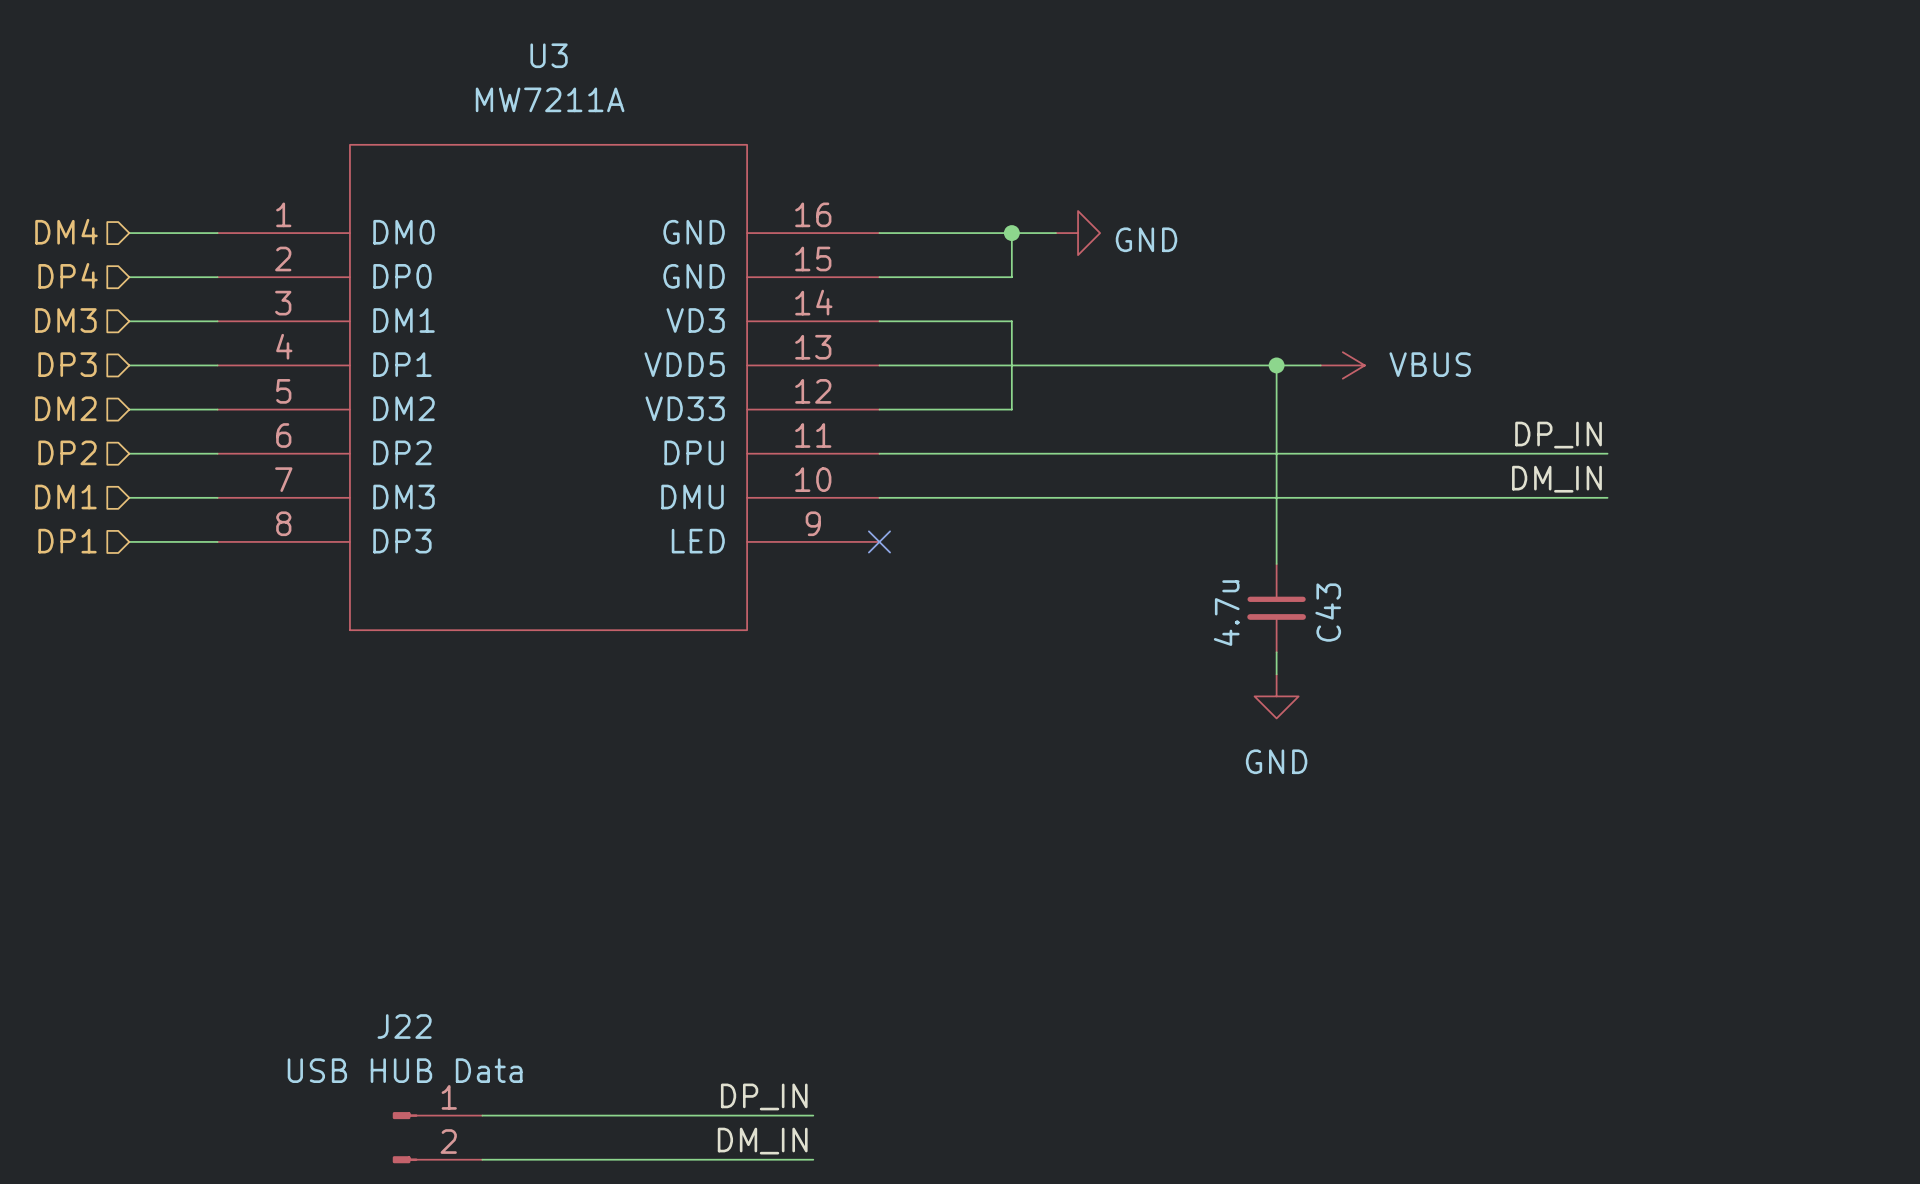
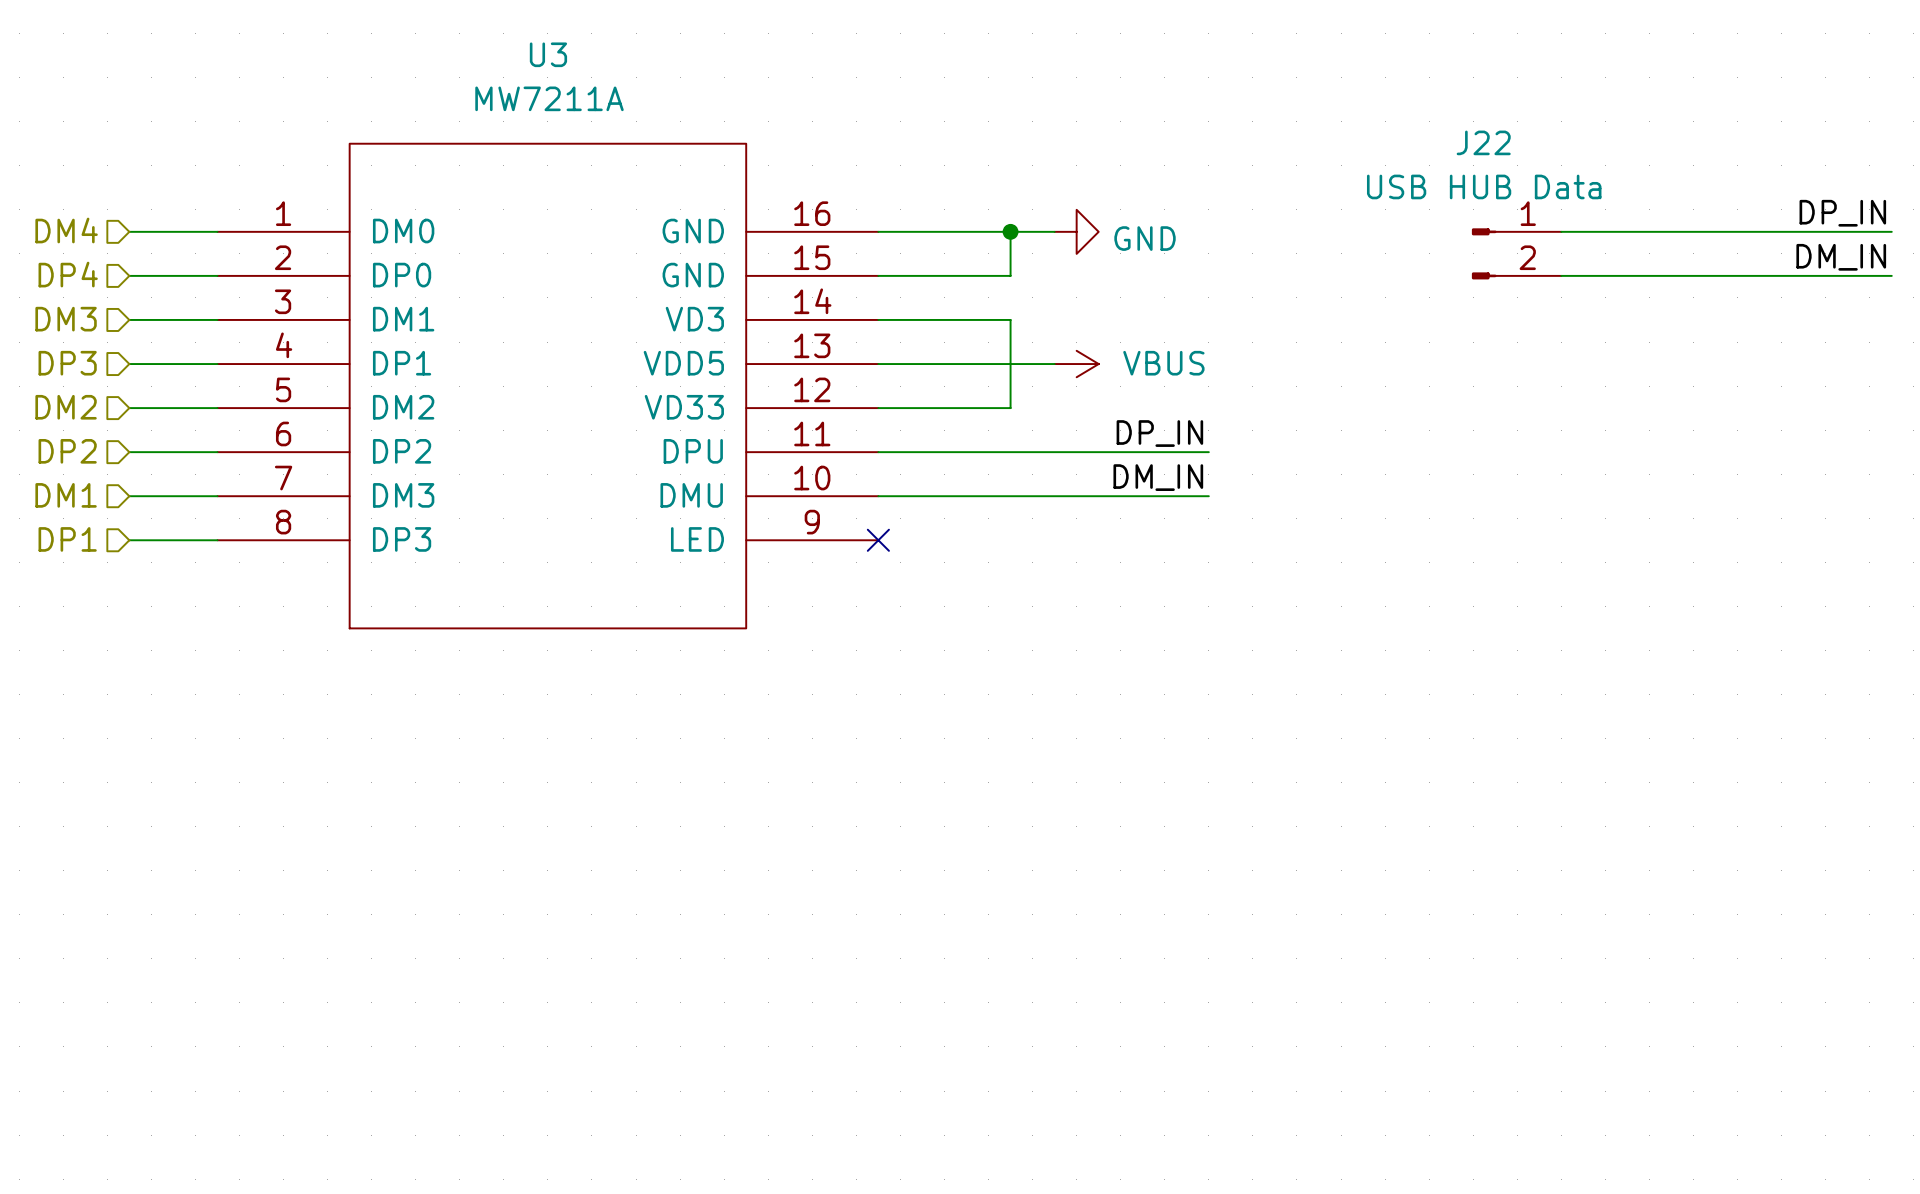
label: none -> DP_IN (1842, 213)
wire: none -> (1561, 231) (1891, 231)
label: none -> DM_IN (1841, 257)
wire: none -> (1561, 275) (1891, 275)
wire: (1055, 365) (1320, 365) -> none
wire: (1276, 365) (1276, 564) -> none
junction: (1276, 365) -> none
power symbol position: VBUS (1342, 365) -> VBUS (1076, 364)
label: none -> DP_IN (1159, 433)
label: DP_IN (1558, 435) -> none
wire: (1210, 453) (1607, 453) -> none
label: none -> DM_IN (1158, 477)
label: DM_IN (1556, 479) -> none
wire: (1210, 497) (1607, 497) -> none
C43: 4.7u (1276, 608) -> none
wire: (1276, 652) (1276, 674) -> none
power symbol: GND (1276, 696) -> none
label: DP_IN (764, 1096) -> none
wire: (482, 1115) (813, 1115) -> none
J22 position: (437, 1137) -> (1516, 253)
label: DM_IN (762, 1141) -> none
wire: (482, 1159) (813, 1159) -> none

